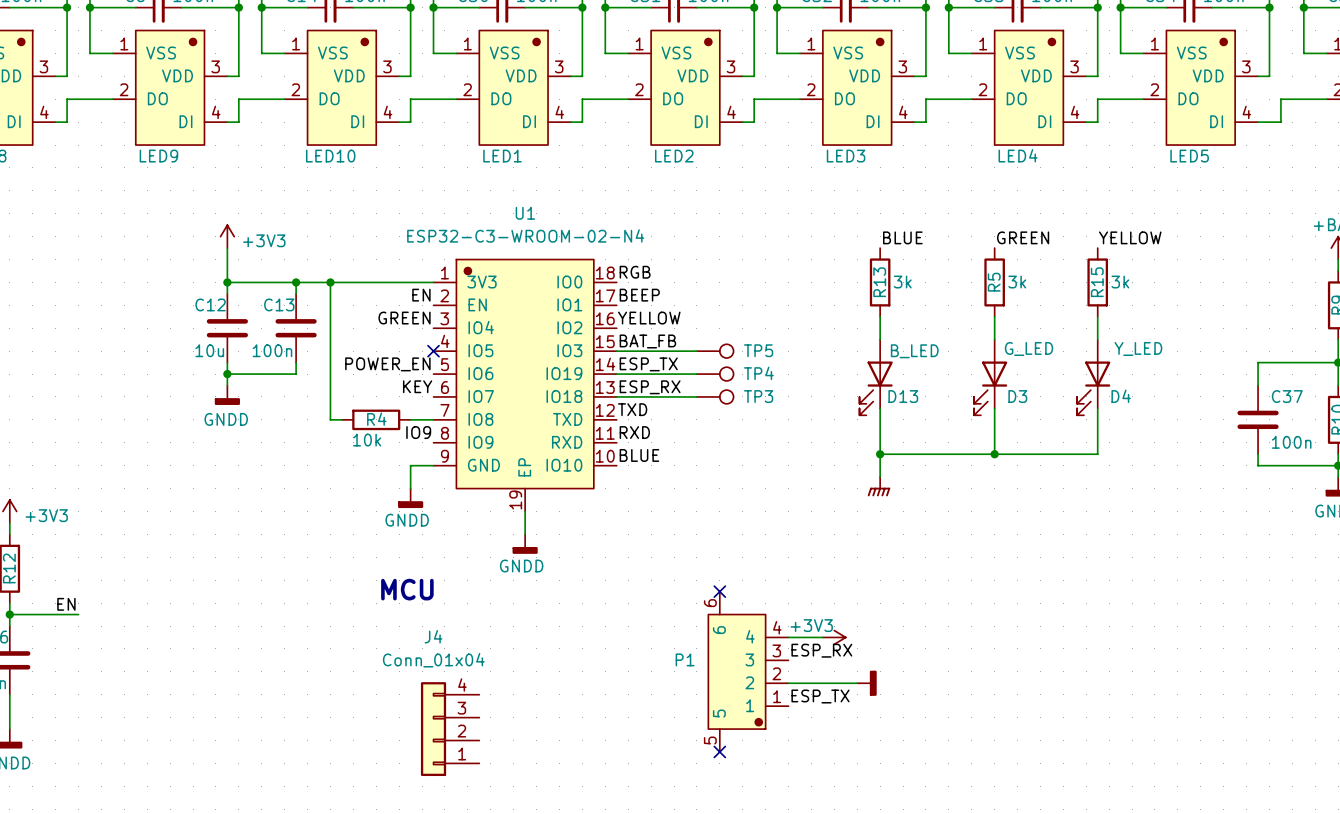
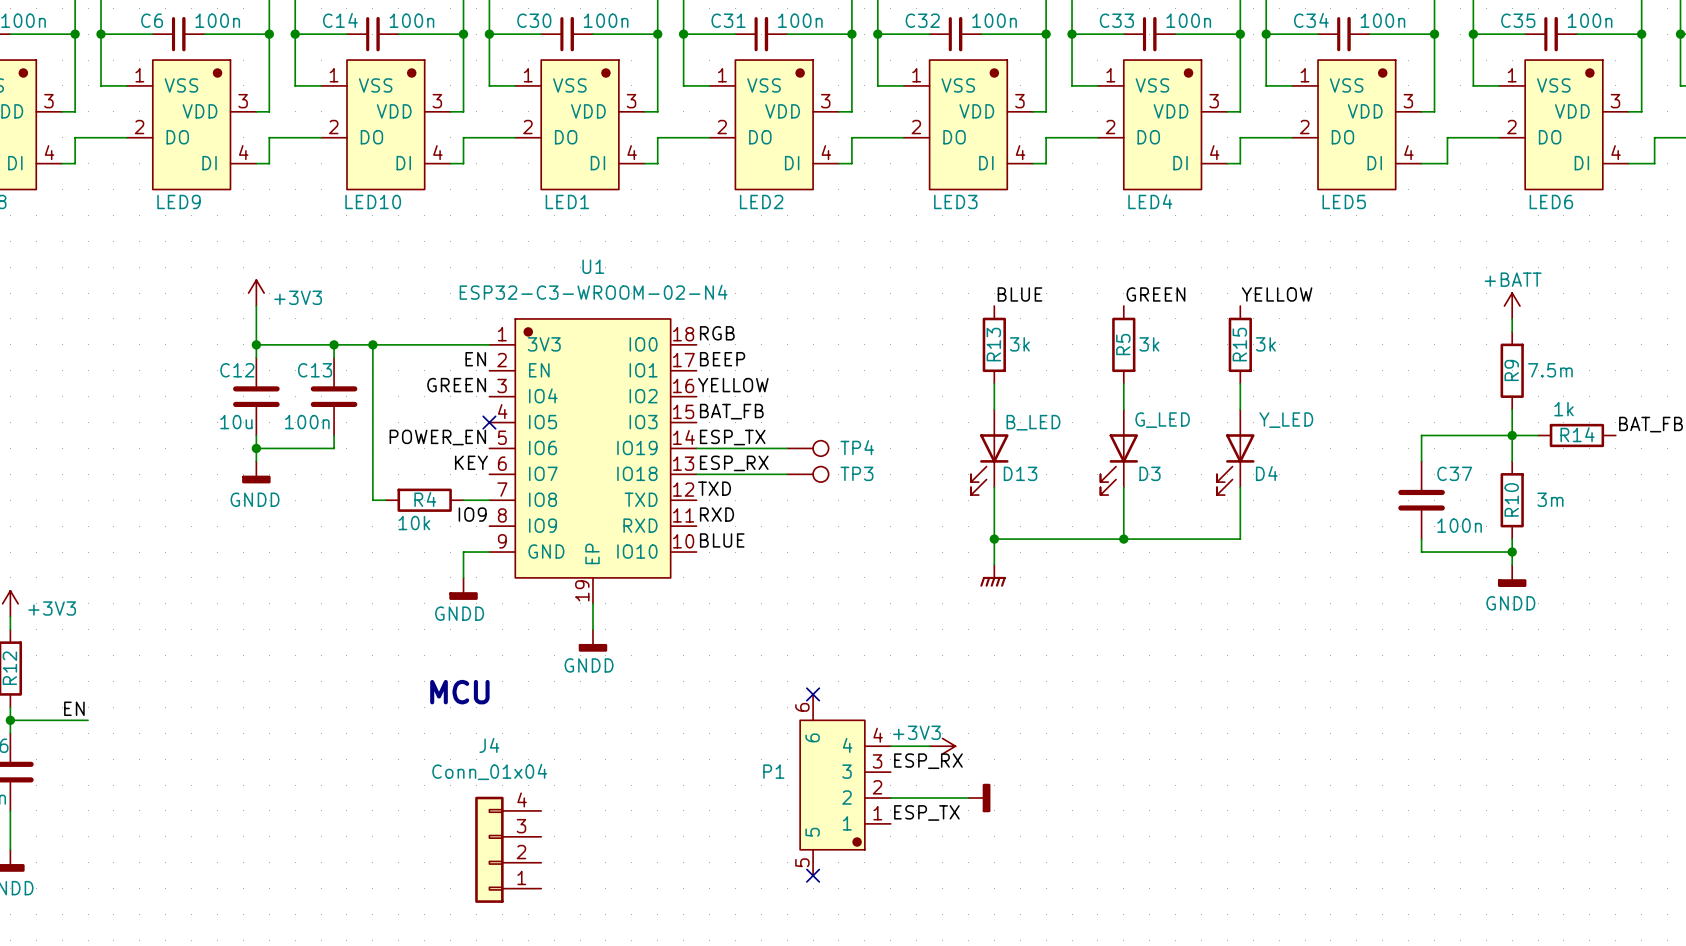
wire: (616, 351) (696, 351) -> none
TP5: (715, 351) -> none

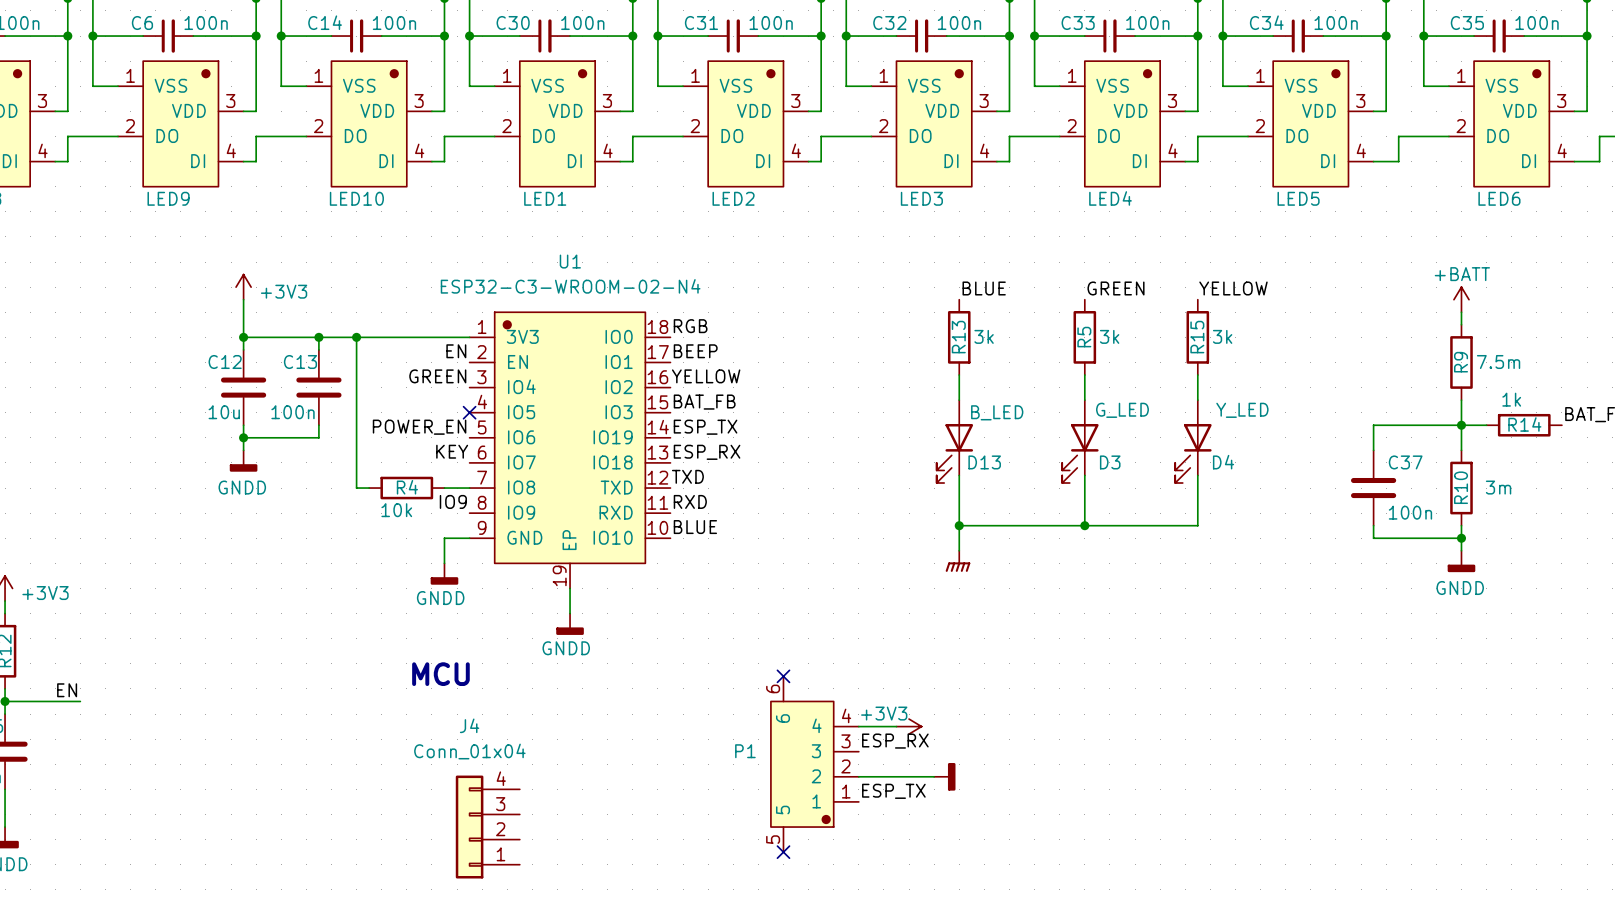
wire: (696, 448) (787, 448) -> none
TP4: (807, 448) -> none
wire: (696, 474) (787, 474) -> none
TP3: (807, 474) -> none

